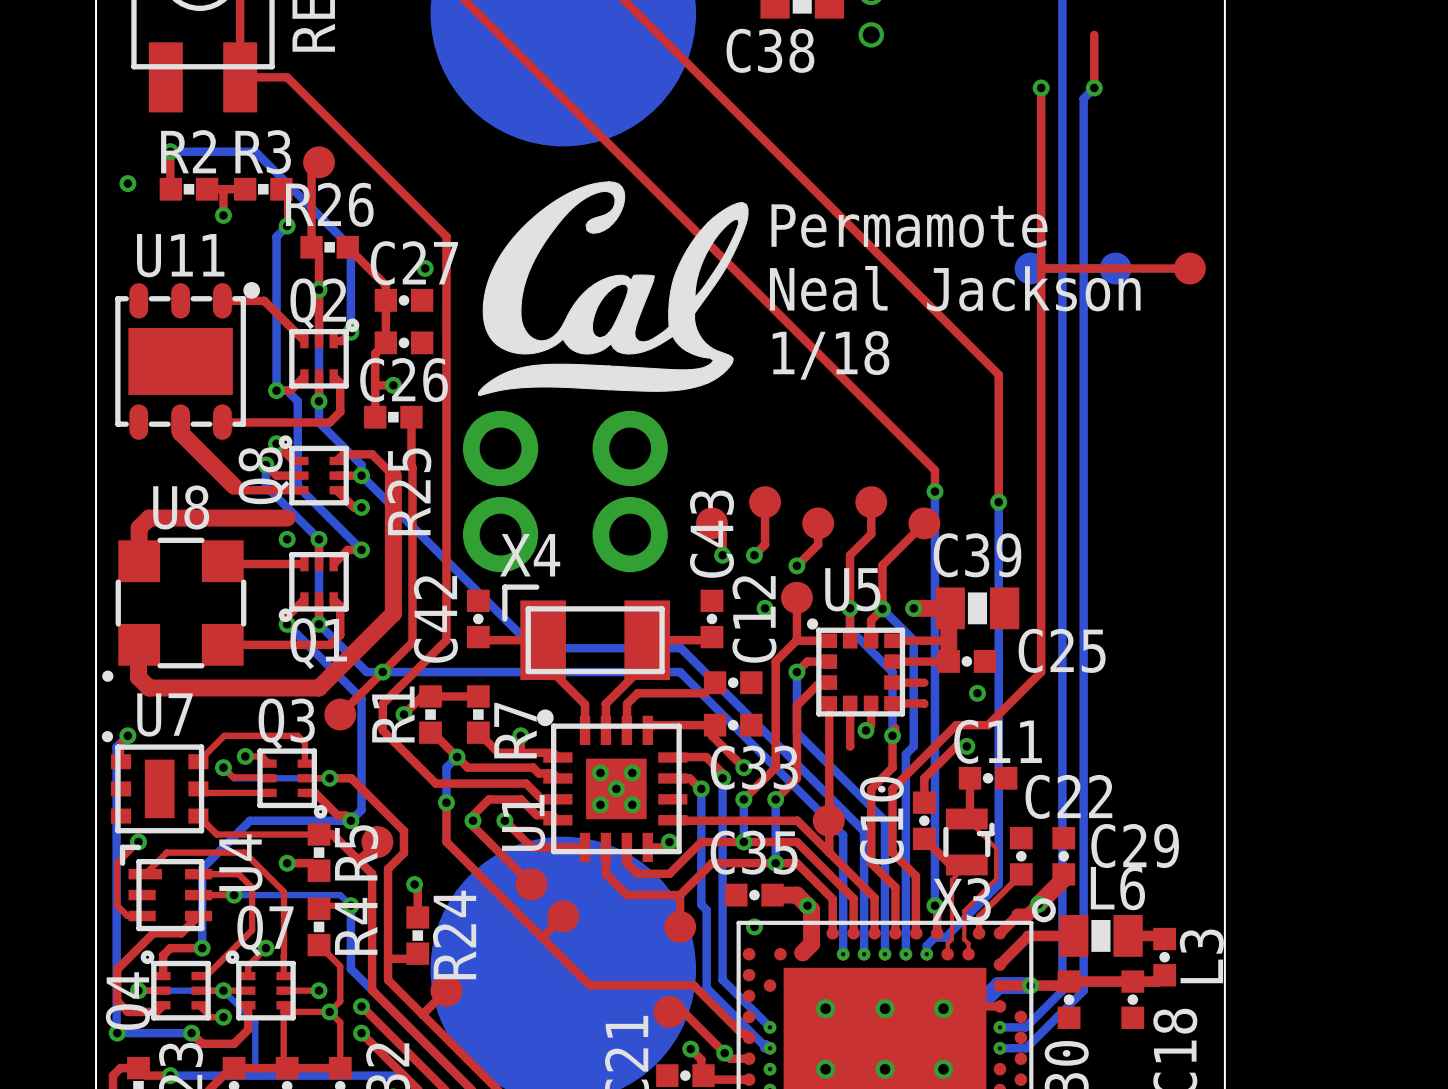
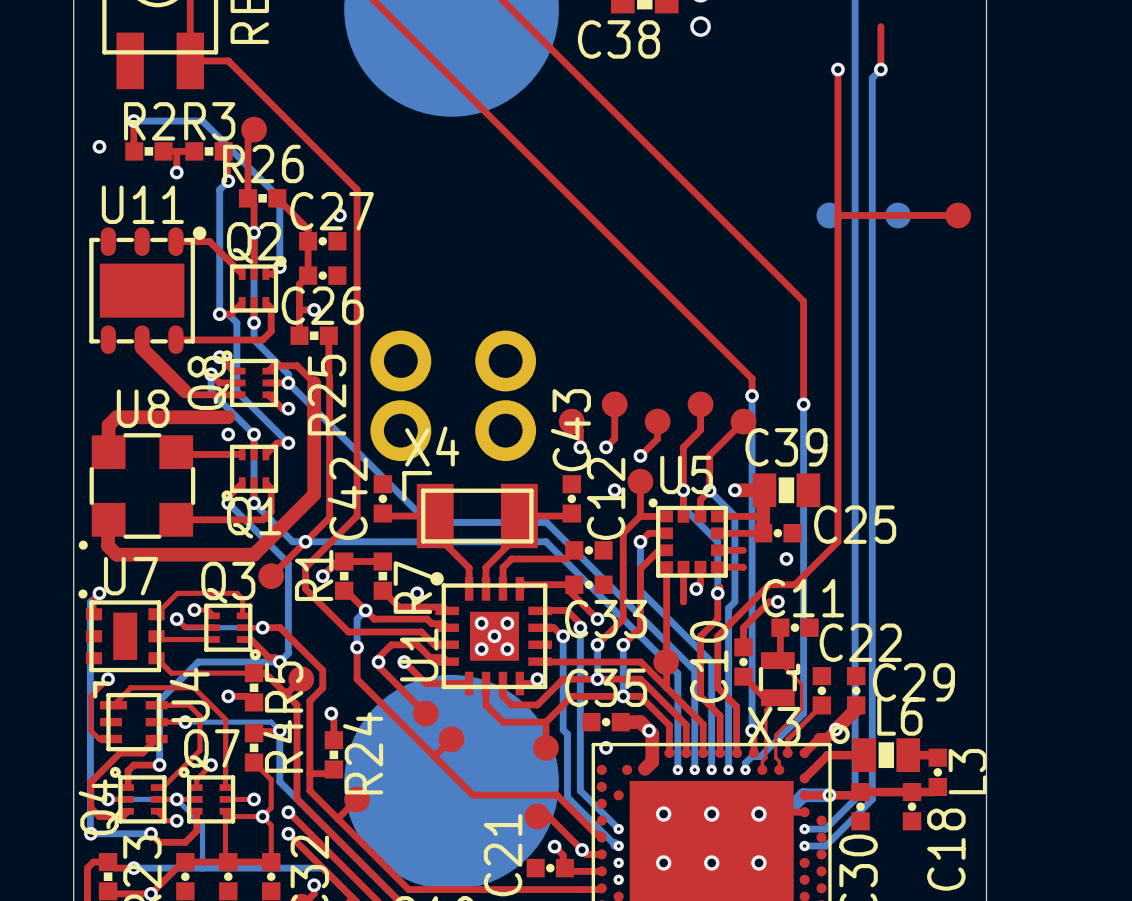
drawing: [477, 181, 749, 397] -> none
text: Permamote (909, 225) -> none
text: Neal Jackson (955, 288) -> none
text: 1/18 (831, 355) -> none

